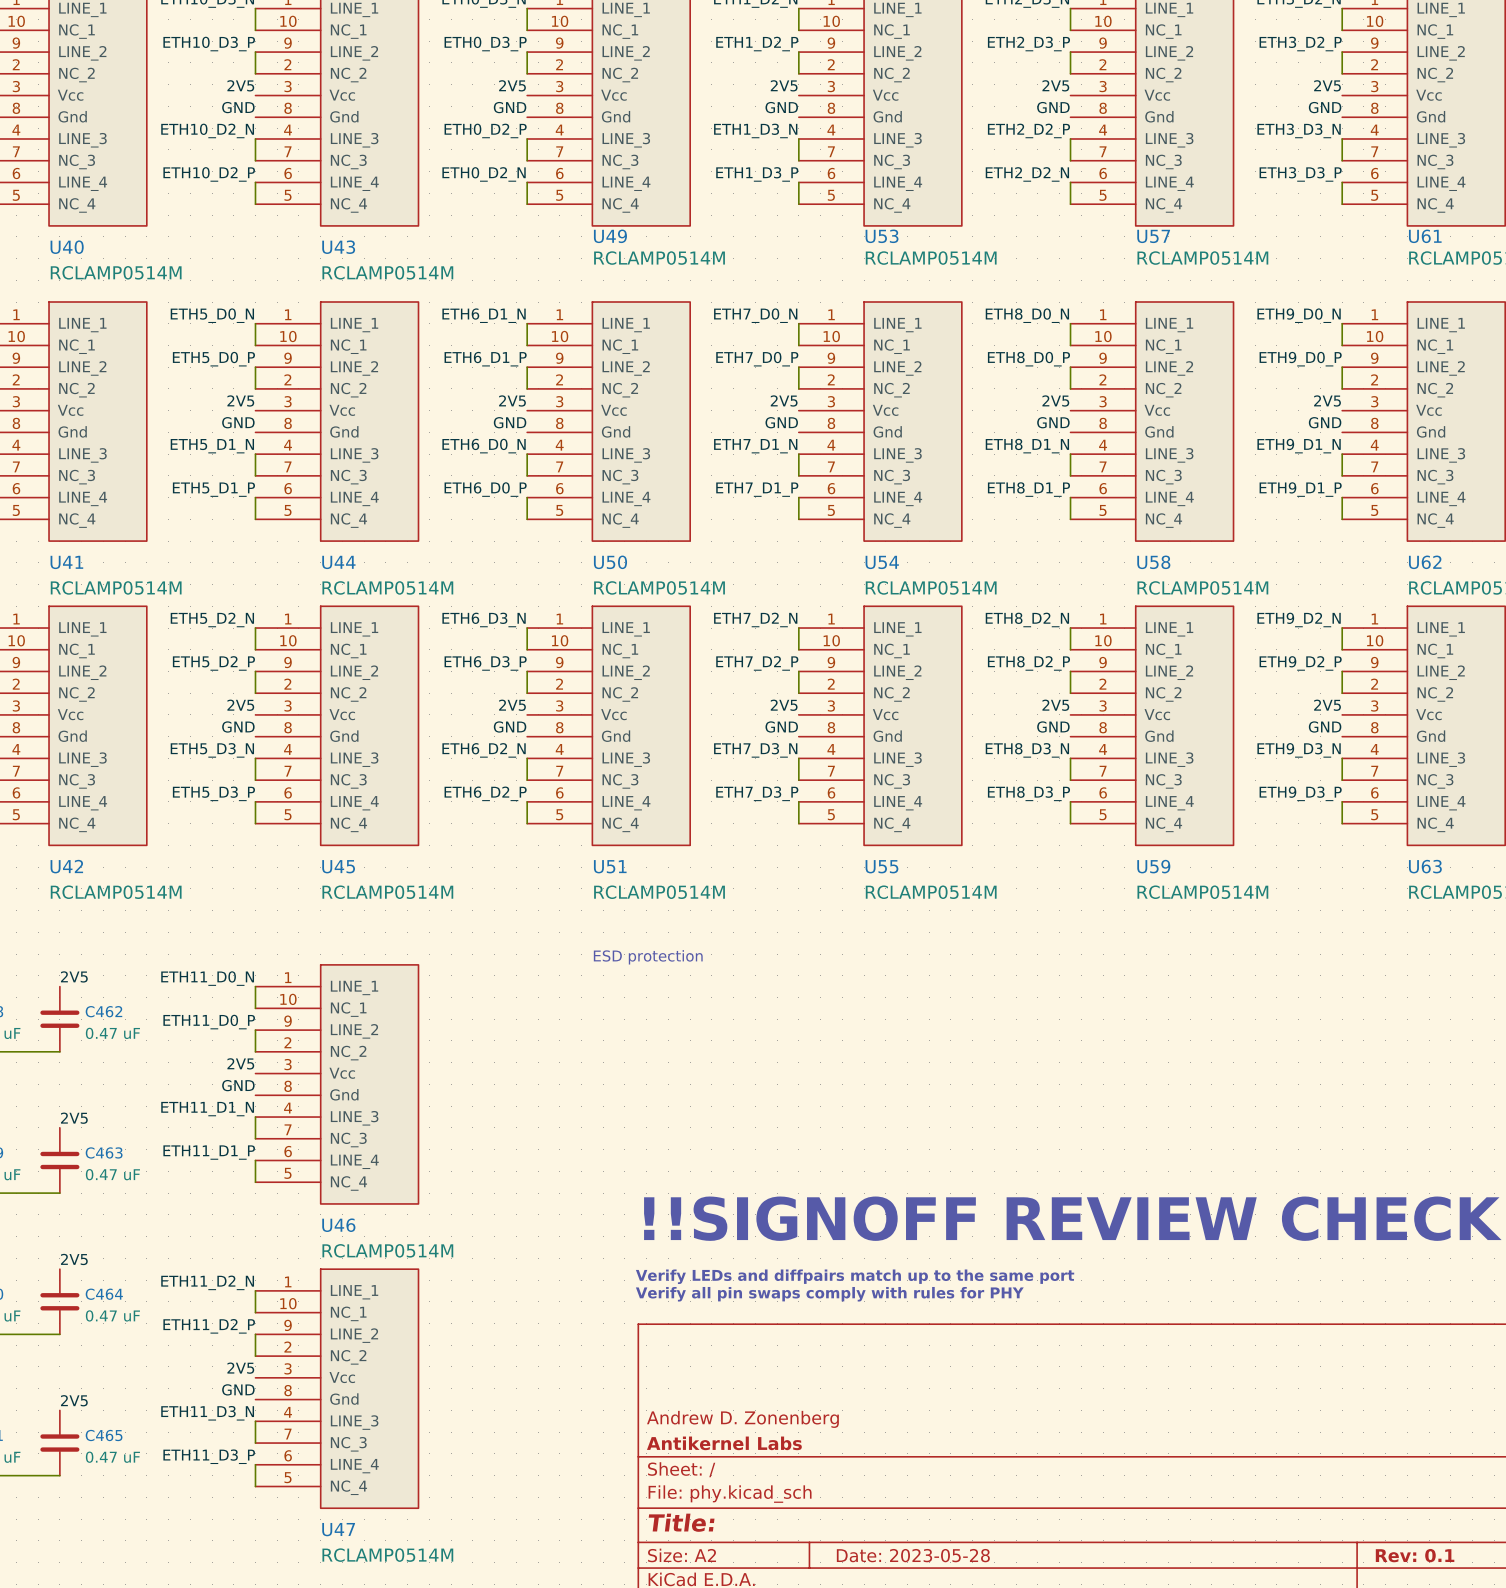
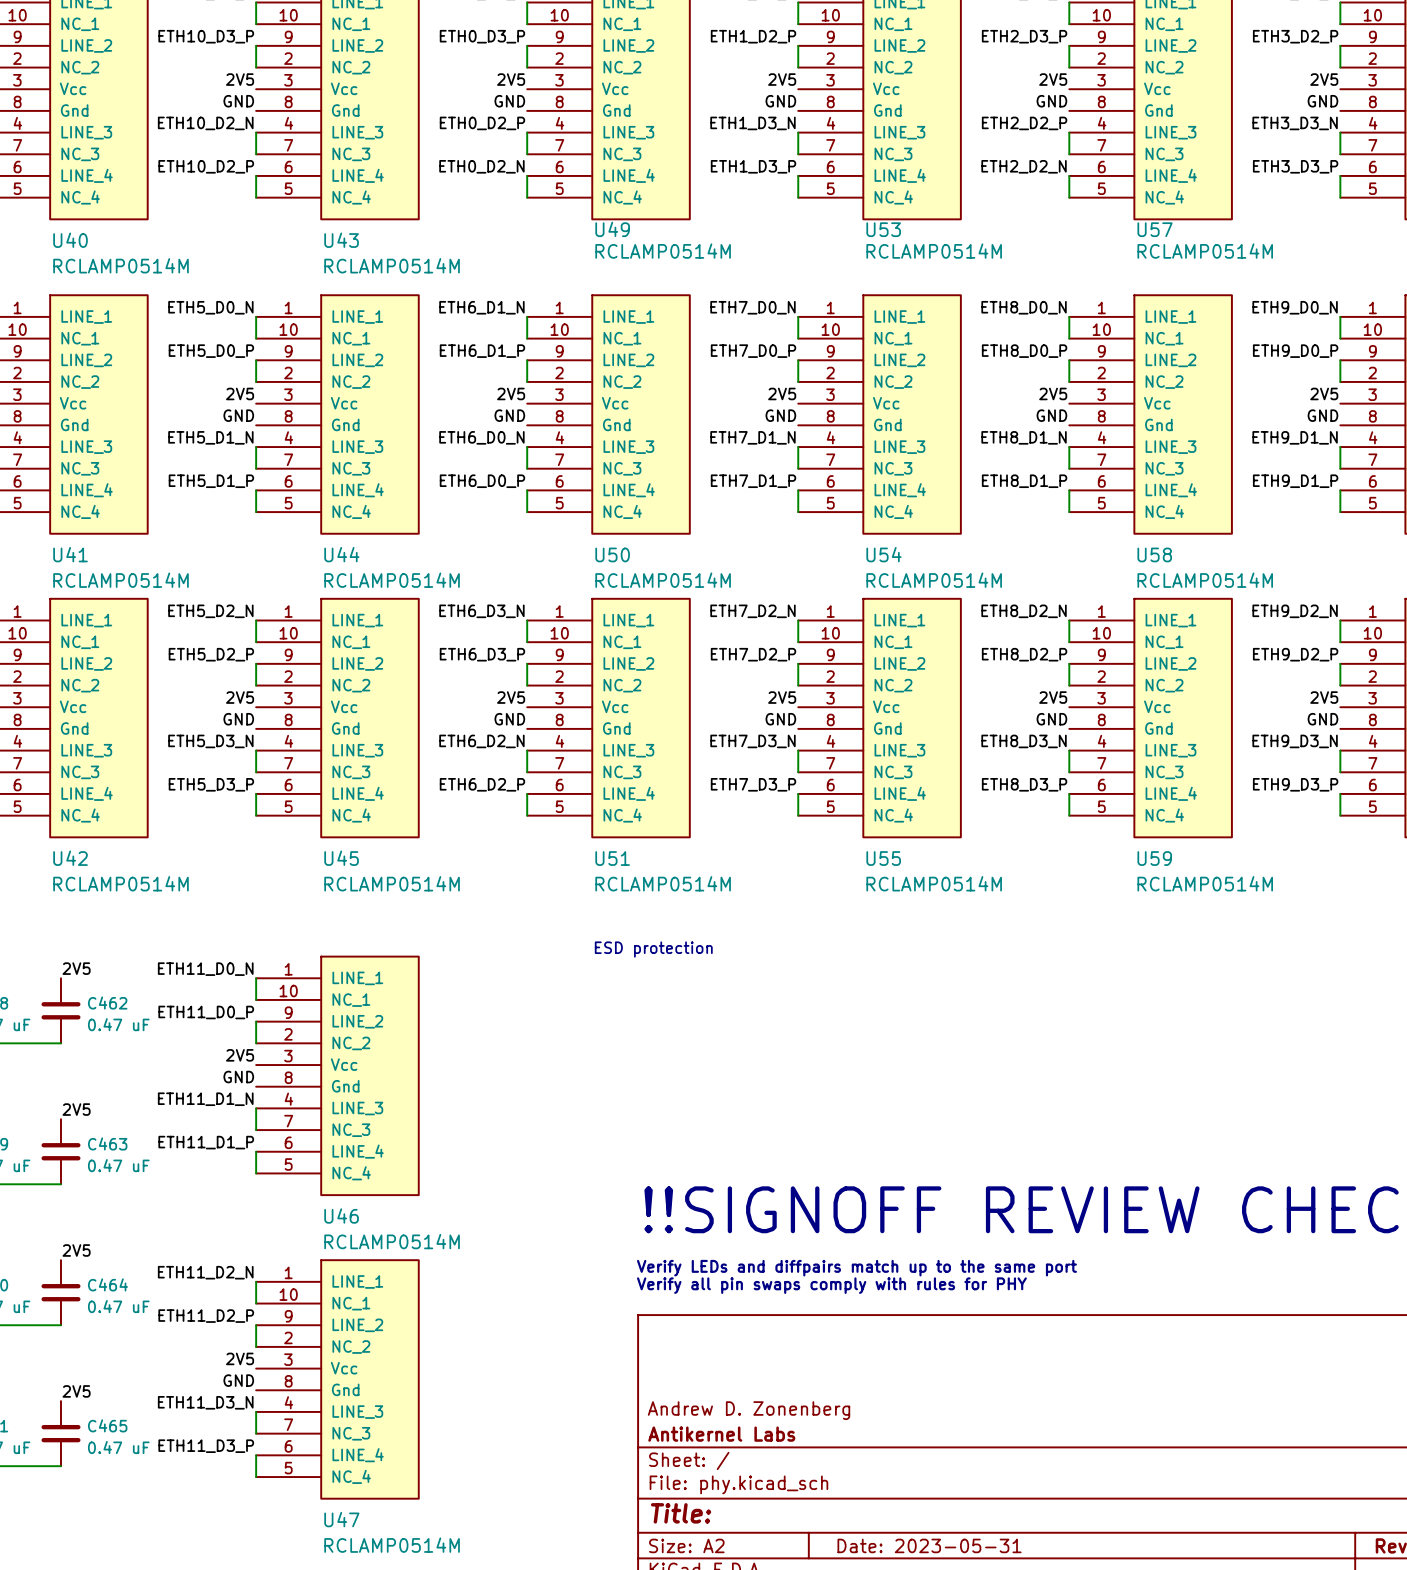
title block: Date: 2023-05-28 (913, 1555) -> Date: 2023-05-31 (929, 1545)

